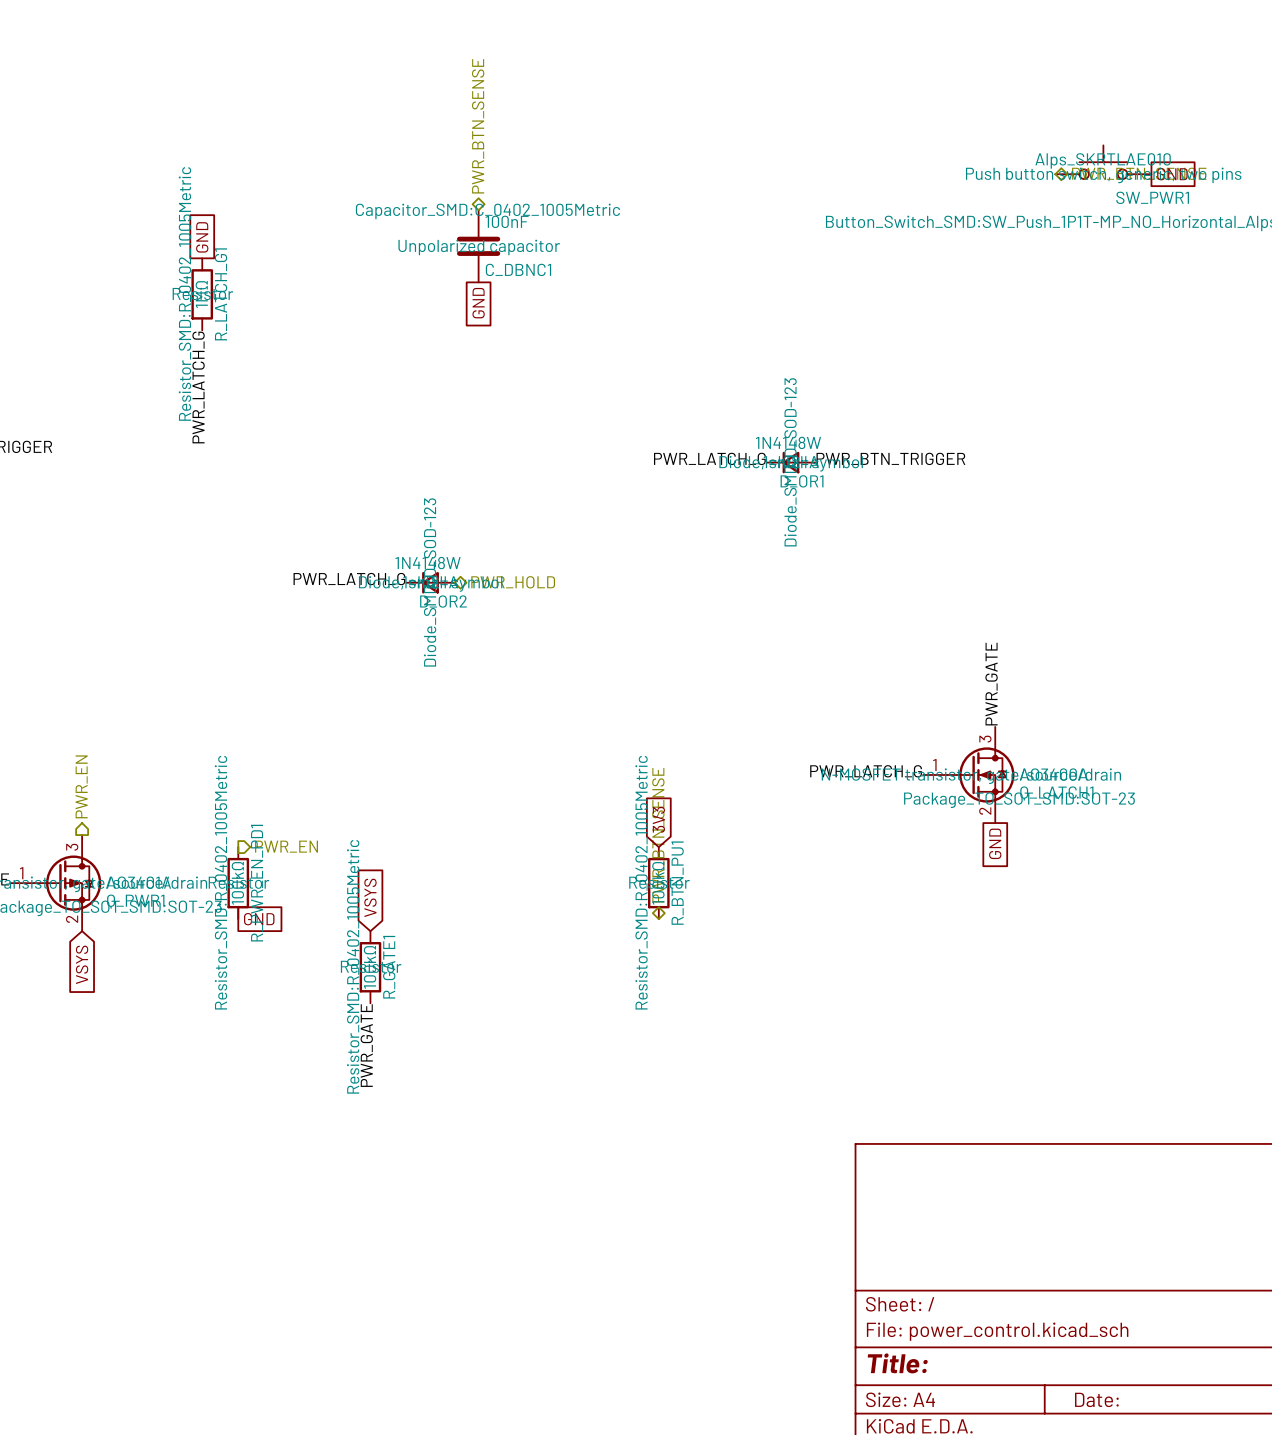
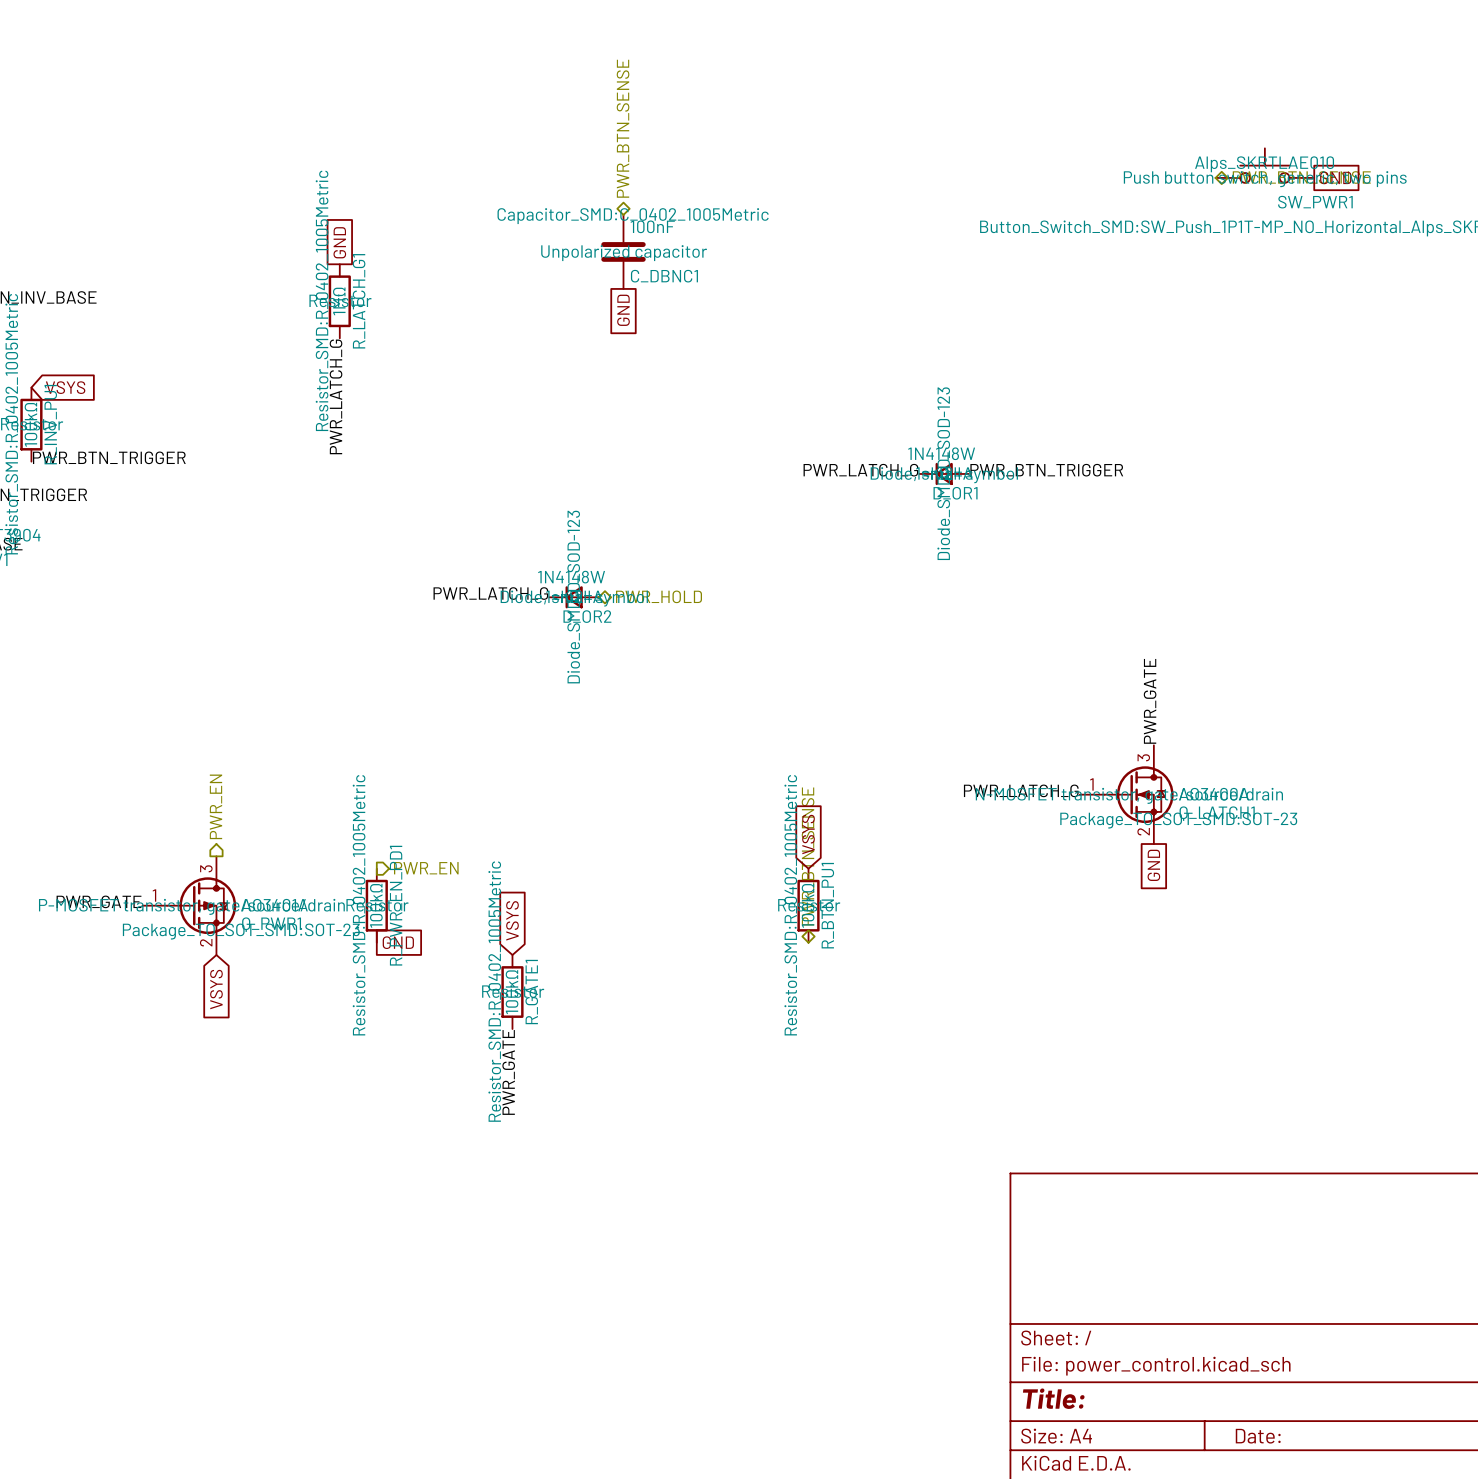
global label: 3V3 (658, 819) -> VSYS (808, 834)

